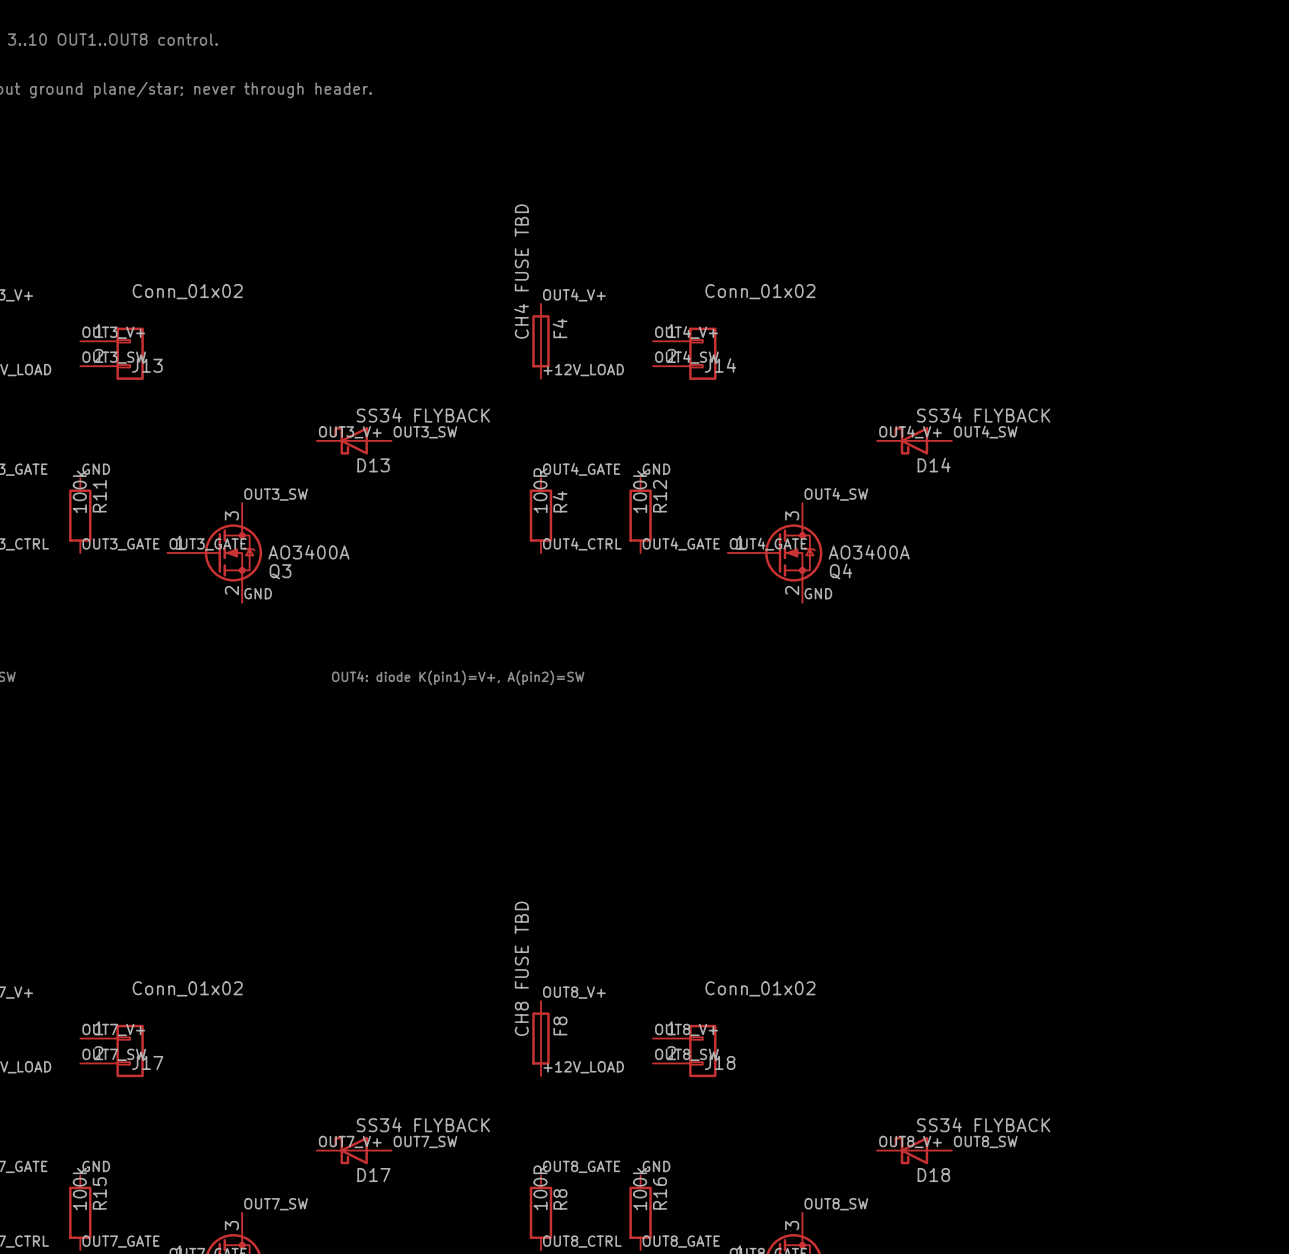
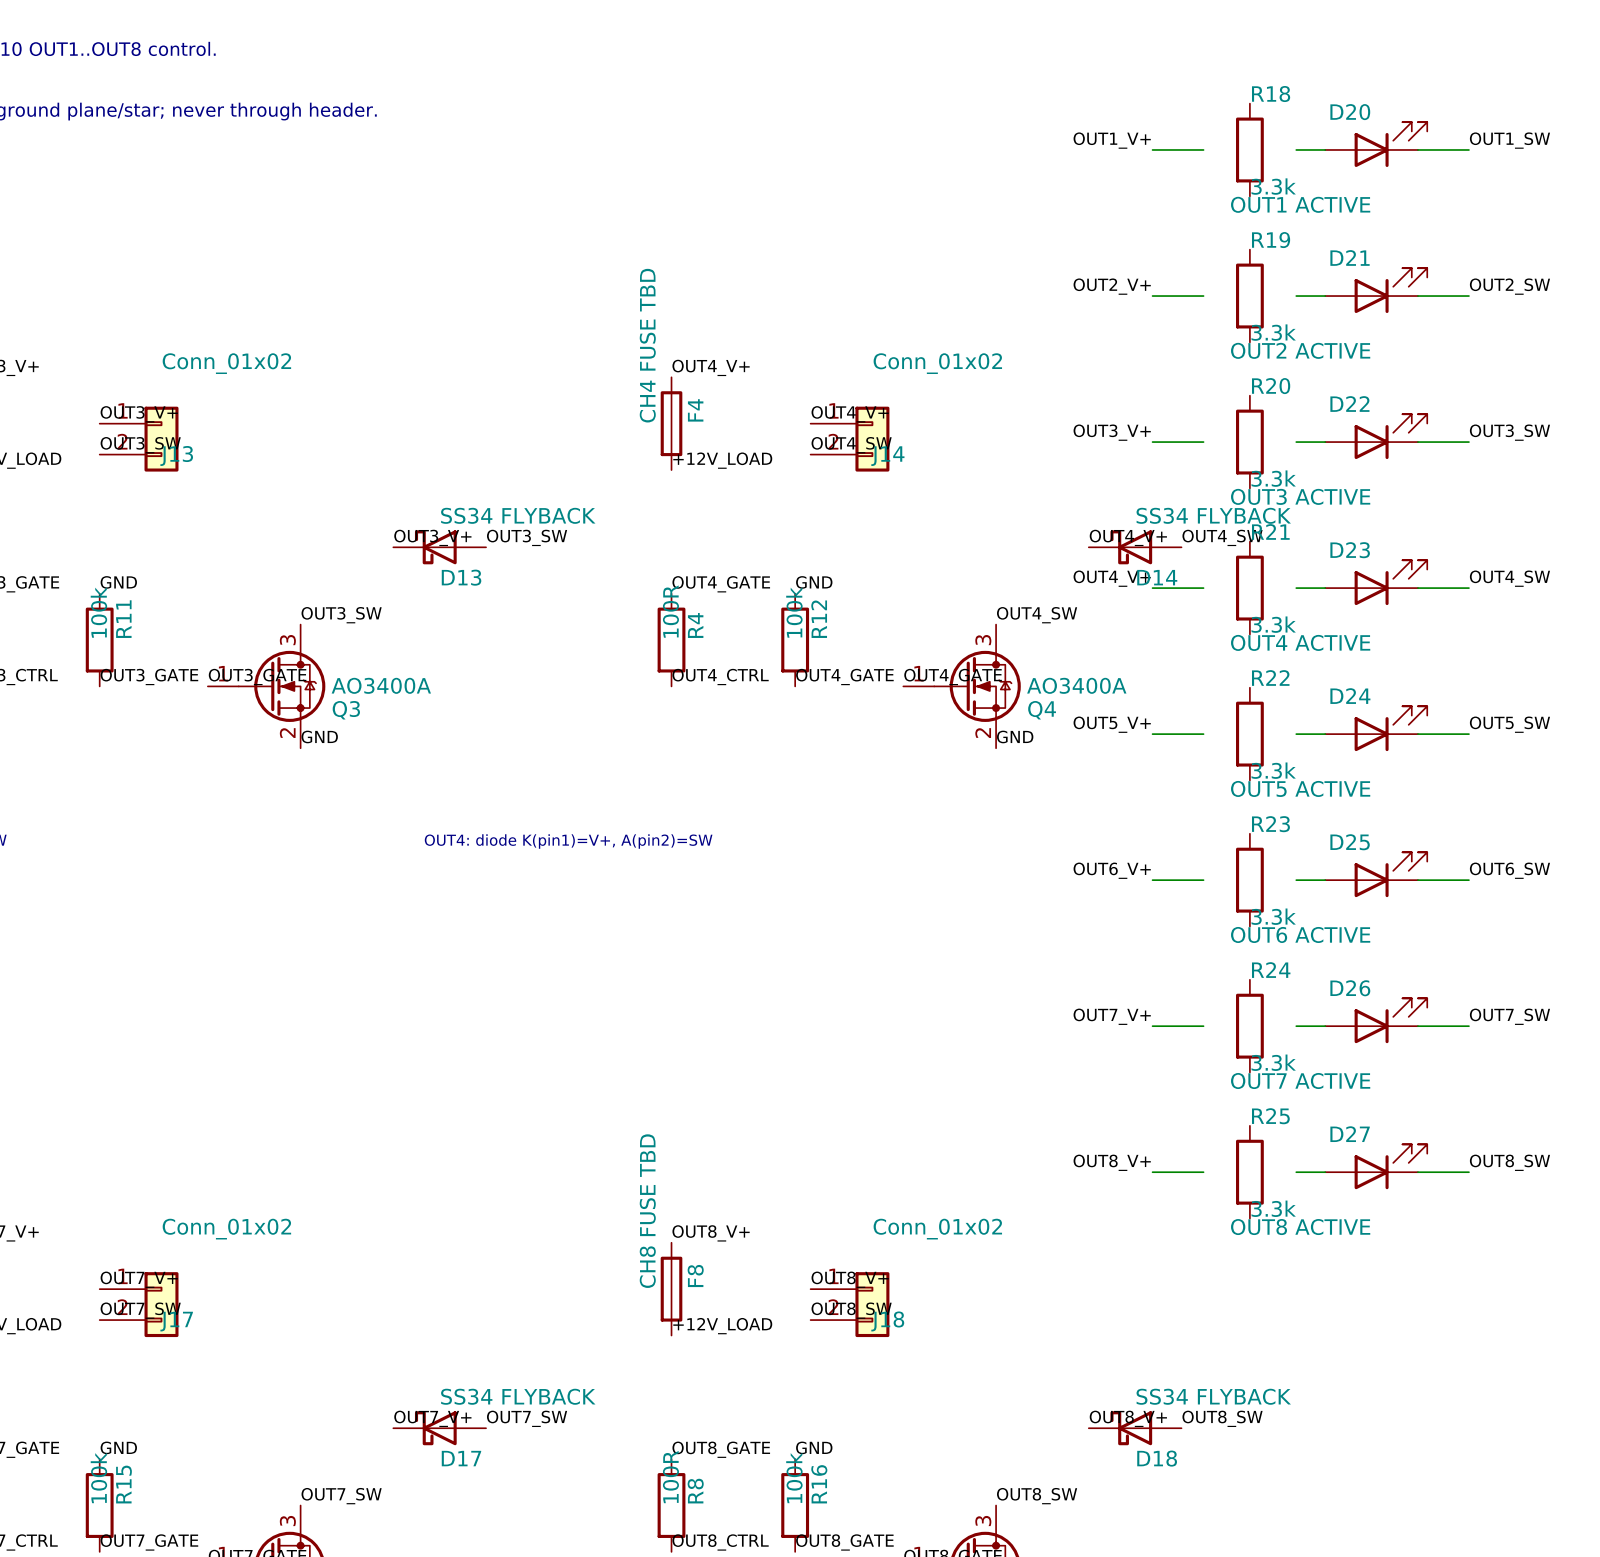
label: none -> OUT1_V+ (1112, 140)
label: none -> OUT1_SW (1509, 140)
D20: none -> OUT1 ACTIVE (1376, 144)
wire: none -> (1152, 149) (1203, 149)
R18: none -> 3.3k (1249, 149)
wire: none -> (1296, 149) (1325, 149)
wire: none -> (1417, 149) (1468, 149)
label: none -> OUT2_V+ (1112, 286)
label: none -> OUT2_SW (1509, 286)
D21: none -> OUT2 ACTIVE (1376, 290)
wire: none -> (1152, 296) (1203, 296)
R19: none -> 3.3k (1249, 296)
wire: none -> (1296, 296) (1325, 296)
wire: none -> (1417, 296) (1468, 296)
label: none -> OUT3_V+ (1112, 432)
label: none -> OUT3_SW (1509, 432)
D22: none -> OUT3 ACTIVE (1376, 436)
wire: none -> (1152, 442) (1203, 442)
R20: none -> 3.3k (1249, 442)
wire: none -> (1296, 442) (1325, 442)
wire: none -> (1417, 442) (1468, 442)
label: none -> OUT4_V+ (1112, 578)
label: none -> OUT4_SW (1509, 578)
D23: none -> OUT4 ACTIVE (1376, 582)
wire: none -> (1152, 588) (1203, 588)
R21: none -> 3.3k (1249, 588)
wire: none -> (1296, 588) (1325, 588)
wire: none -> (1417, 588) (1468, 588)
label: none -> OUT5_V+ (1112, 724)
label: none -> OUT5_SW (1509, 724)
D24: none -> OUT5 ACTIVE (1376, 728)
wire: none -> (1152, 734) (1203, 734)
R22: none -> 3.3k (1249, 734)
wire: none -> (1296, 734) (1325, 734)
wire: none -> (1417, 734) (1468, 734)
label: none -> OUT6_V+ (1112, 870)
label: none -> OUT6_SW (1509, 870)
D25: none -> OUT6 ACTIVE (1376, 874)
wire: none -> (1152, 880) (1203, 880)
R23: none -> 3.3k (1249, 880)
wire: none -> (1296, 880) (1325, 880)
wire: none -> (1417, 880) (1468, 880)
label: none -> OUT7_V+ (1112, 1016)
label: none -> OUT7_SW (1509, 1016)
D26: none -> OUT7 ACTIVE (1376, 1020)
wire: none -> (1152, 1026) (1203, 1026)
R24: none -> 3.3k (1249, 1026)
wire: none -> (1296, 1026) (1325, 1026)
wire: none -> (1417, 1026) (1468, 1026)
label: none -> OUT8_V+ (1112, 1162)
label: none -> OUT8_SW (1509, 1162)
D27: none -> OUT8 ACTIVE (1376, 1166)
wire: none -> (1152, 1172) (1203, 1172)
R25: none -> 3.3k (1249, 1172)
wire: none -> (1296, 1172) (1325, 1172)
wire: none -> (1417, 1172) (1468, 1172)

